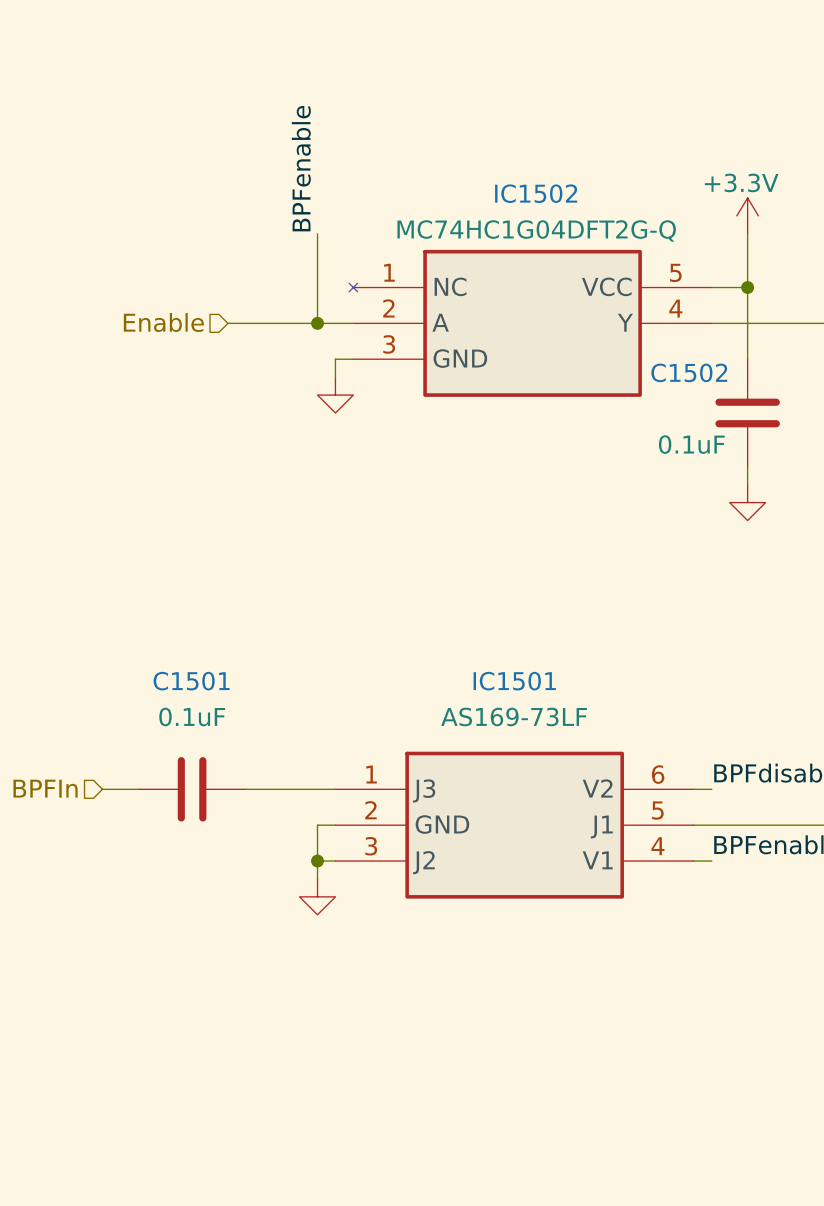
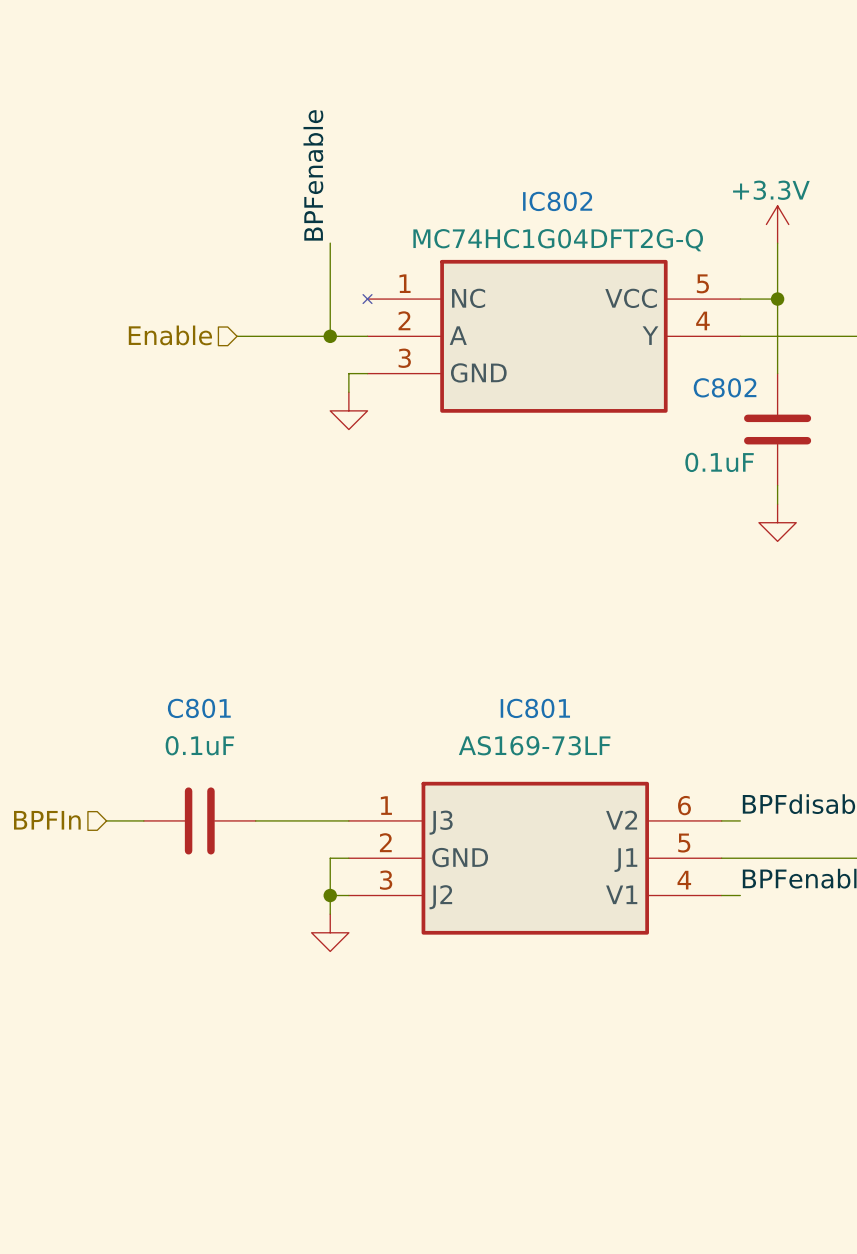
IC1502 name: IC1502 (536, 193) -> IC802 (557, 201)
C1502 name: C1502 (689, 372) -> C802 (725, 387)
C1501 name: C1501 (191, 681) -> C801 (199, 708)
IC1501 name: IC1501 (514, 681) -> IC801 (535, 708)

